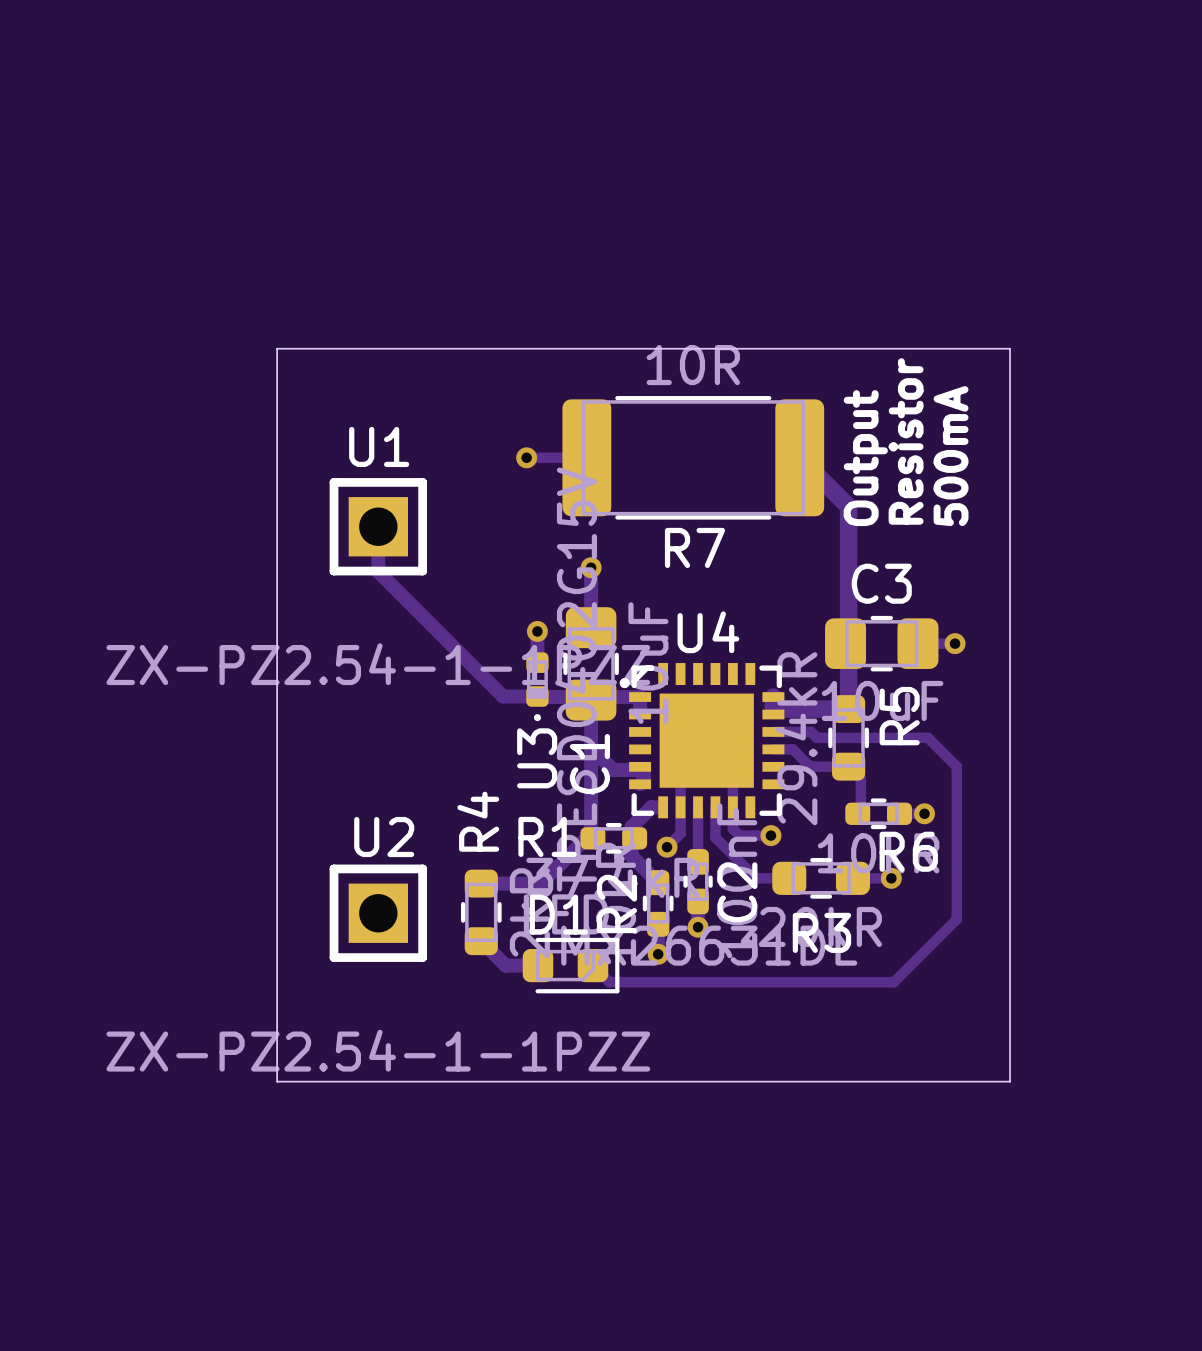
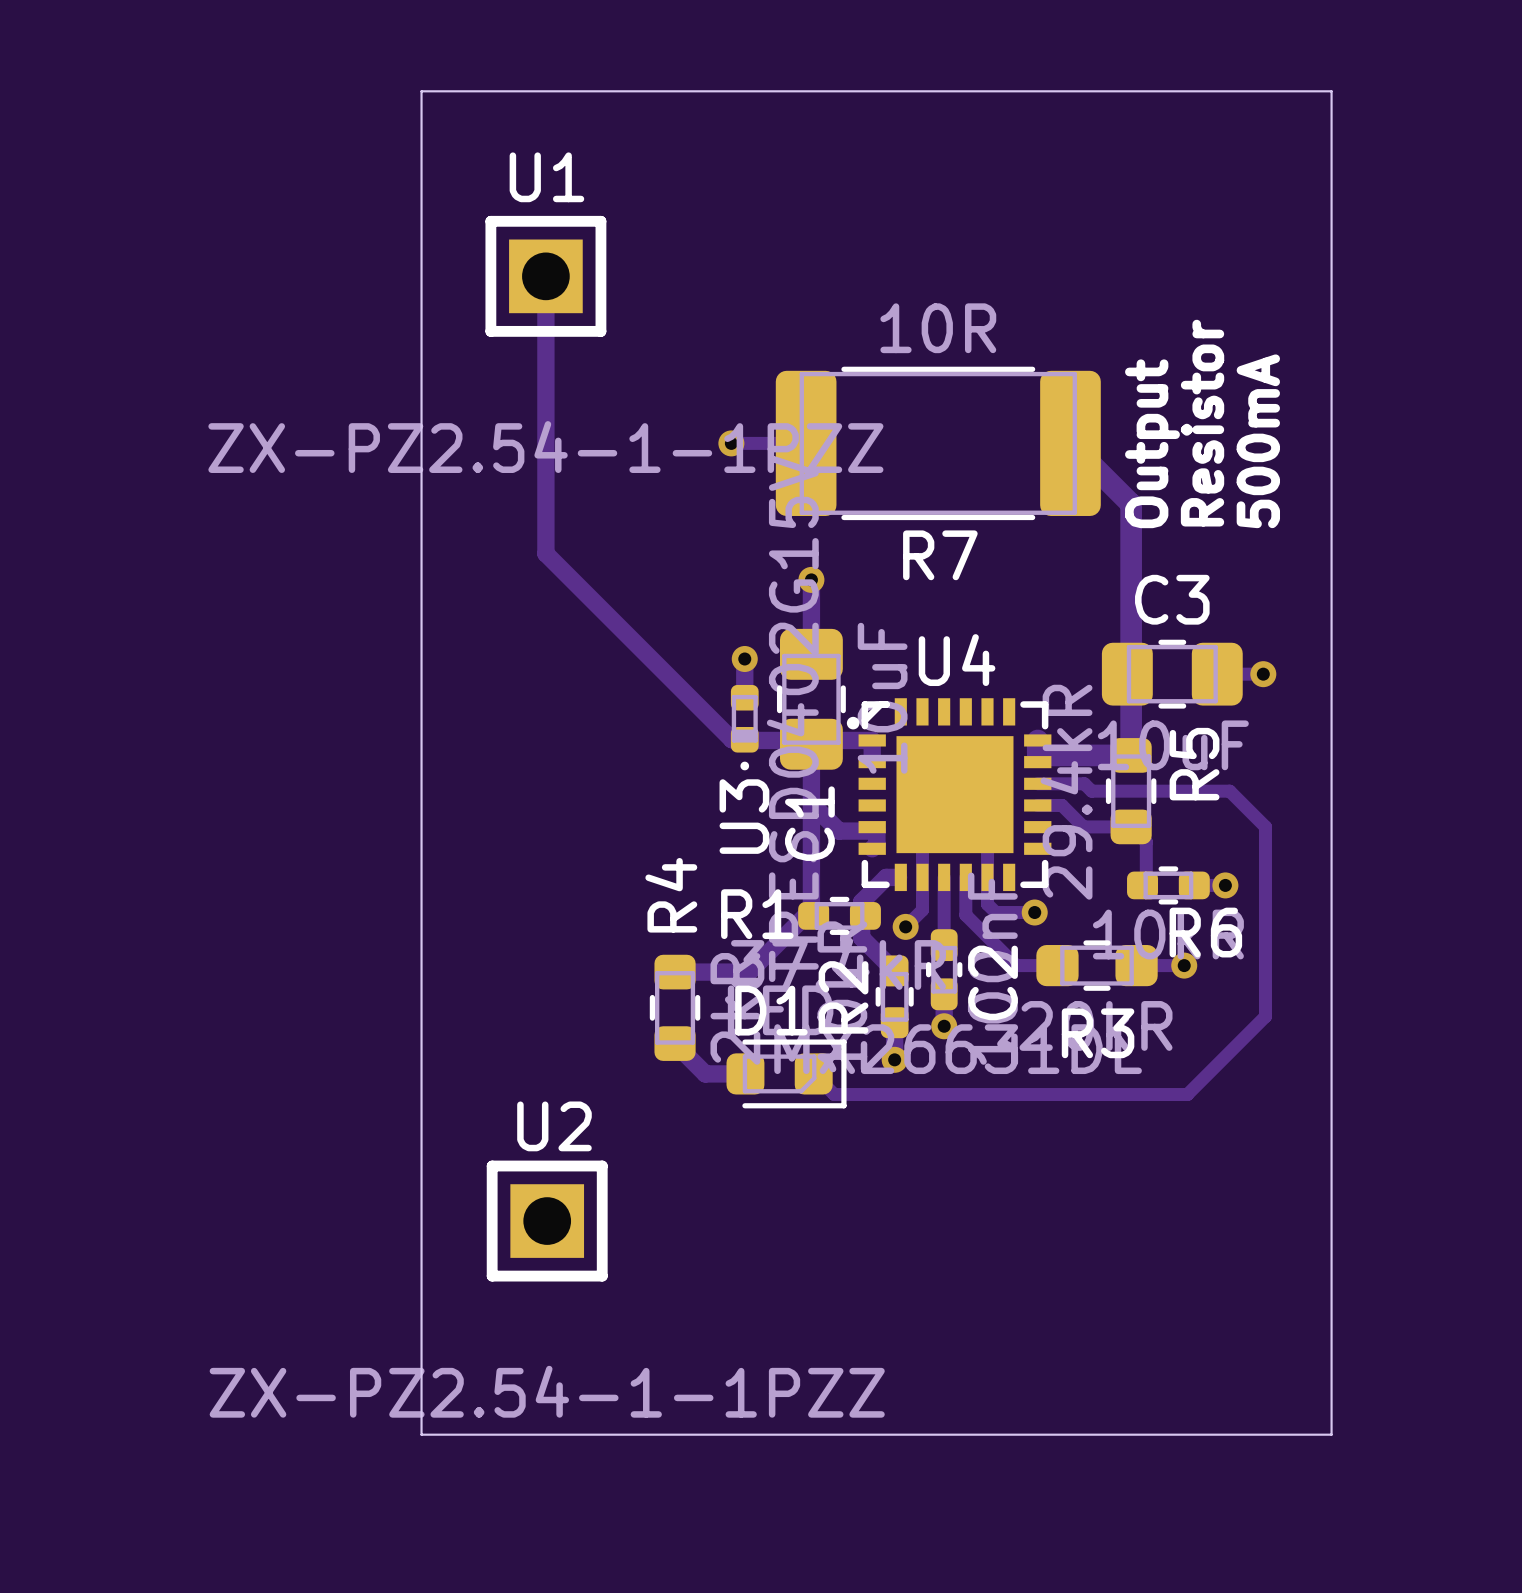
board edge: (277, 348) (1010, 348) -> (421, 307) (421, 91) (1331, 91) (1331, 307)
track: (378, 526) (378, 571) (503, 696) (527, 696) -> (545, 276) (545, 553) (731, 739)
U1 position: (378, 526) -> (545, 276)
U2 position: (378, 913) -> (547, 1221)
board edge: (277, 1081) (1010, 1081) -> (421, 1218) (421, 1434) (1331, 1434) (1331, 1218)

